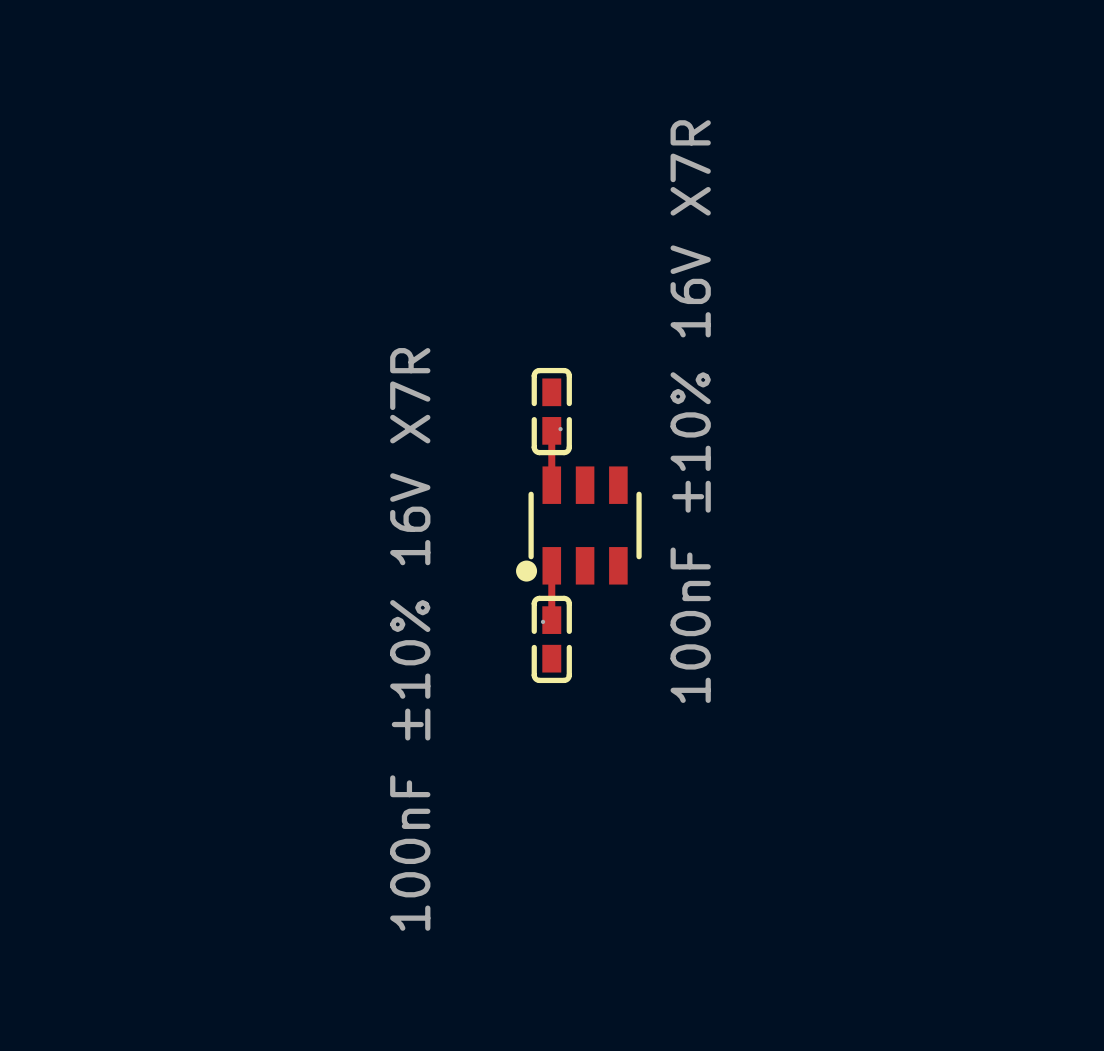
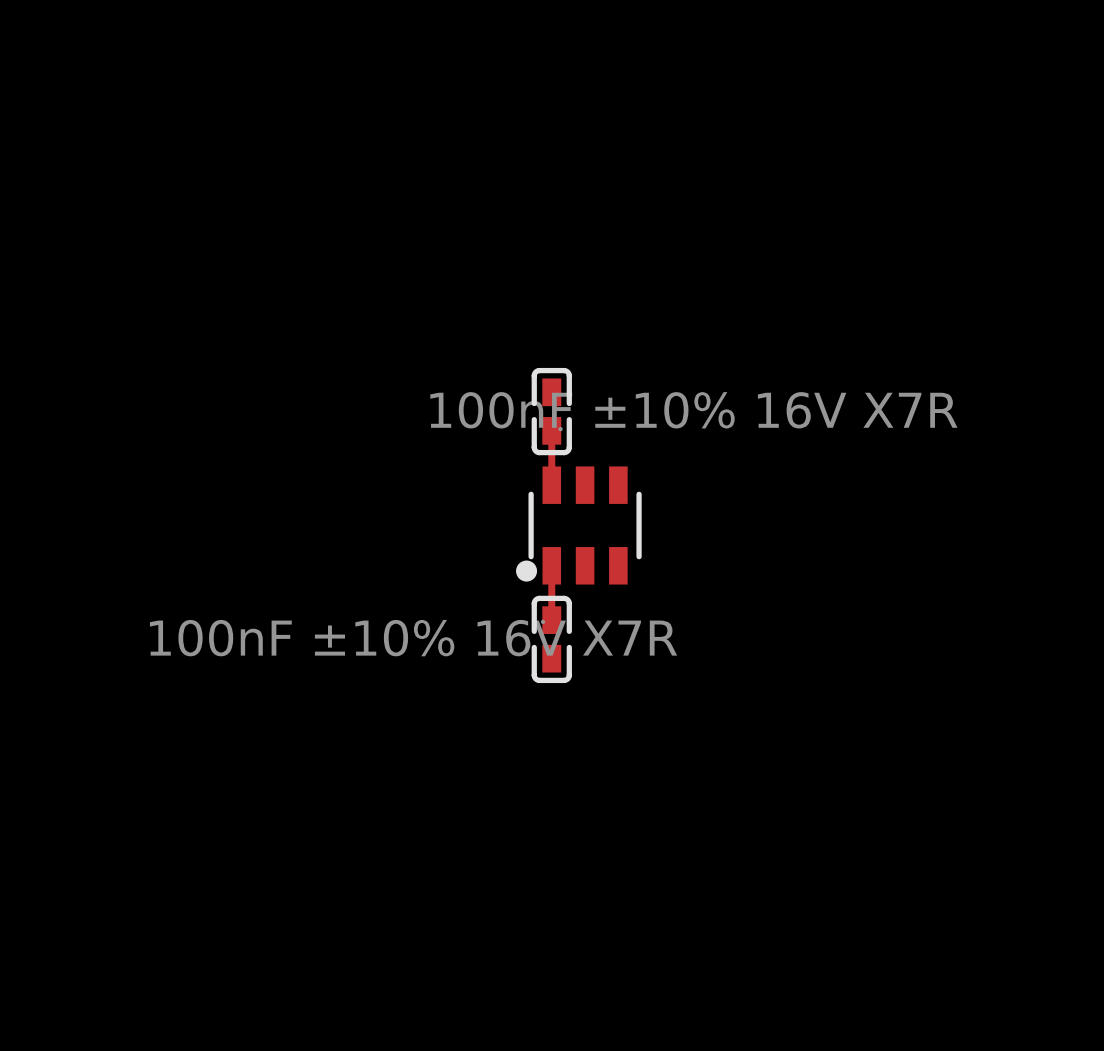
part value rotation: 0° (690, 411) -> 90° clockwise (693, 410)
part value rotation: 0° (410, 639) -> 90° clockwise (413, 638)

